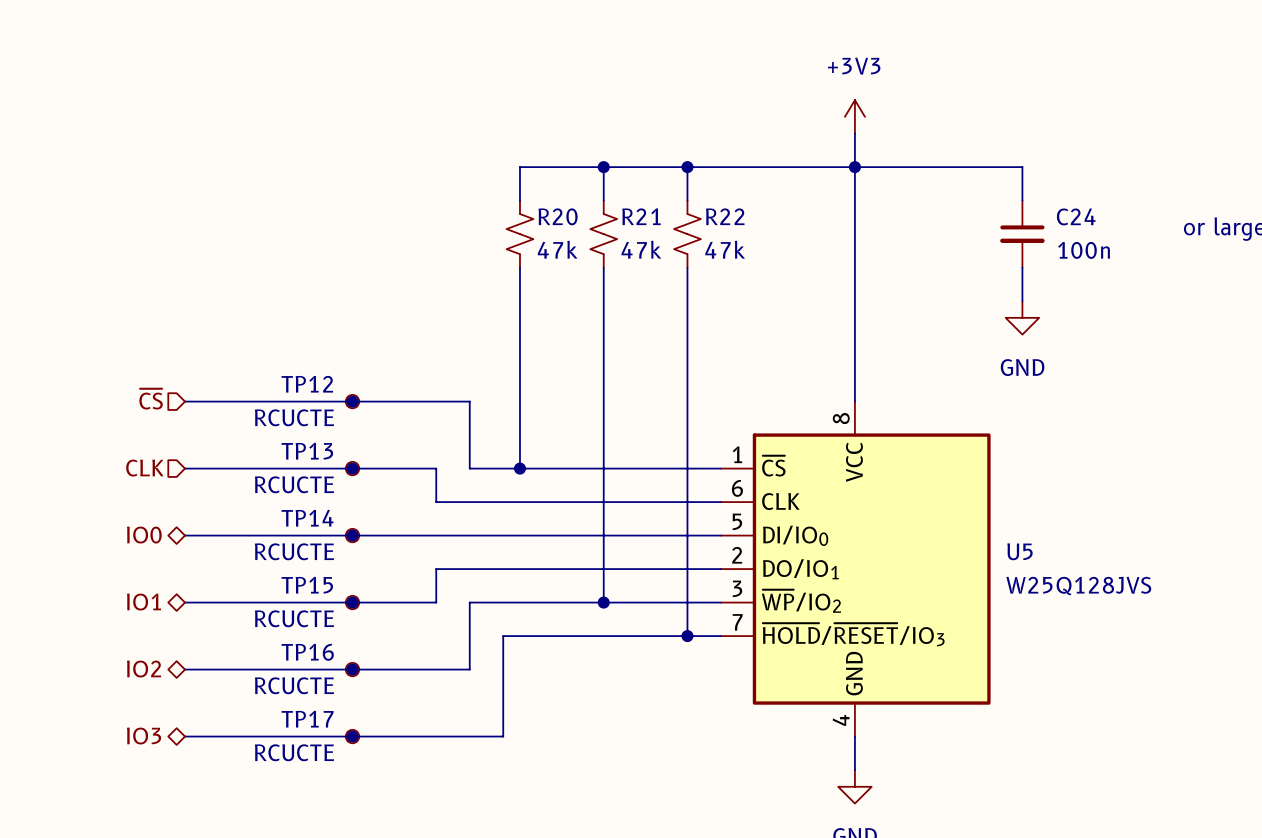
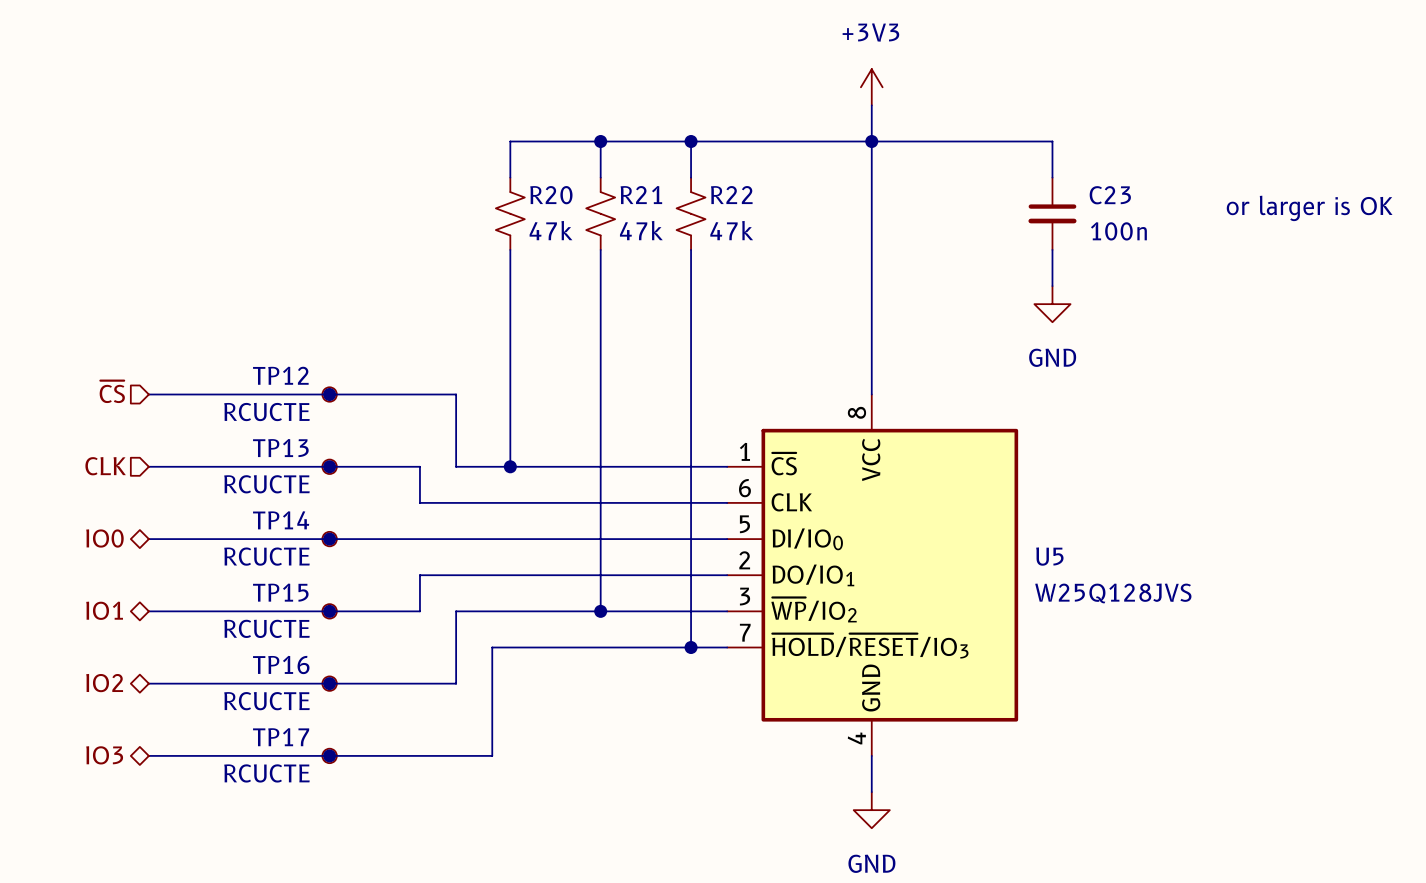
C24 name: C24 (1076, 216) -> C23 (1110, 195)

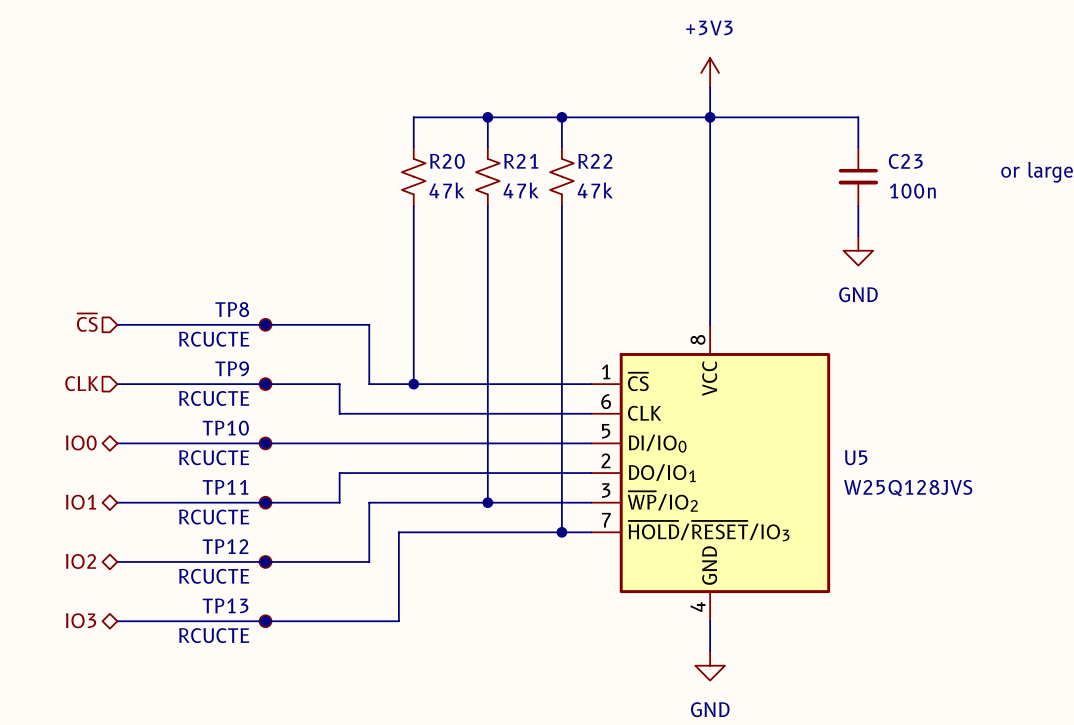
TP12 name: TP12 (280, 375) -> TP8 (232, 309)
TP13 name: TP13 (280, 448) -> TP9 (232, 368)
TP14 name: TP14 (281, 520) -> TP10 (225, 428)
TP15 name: TP15 (280, 592) -> TP11 (225, 487)
TP16 name: TP16 (281, 665) -> TP12 (225, 546)
TP17 name: TP17 (281, 737) -> TP13 (225, 605)

